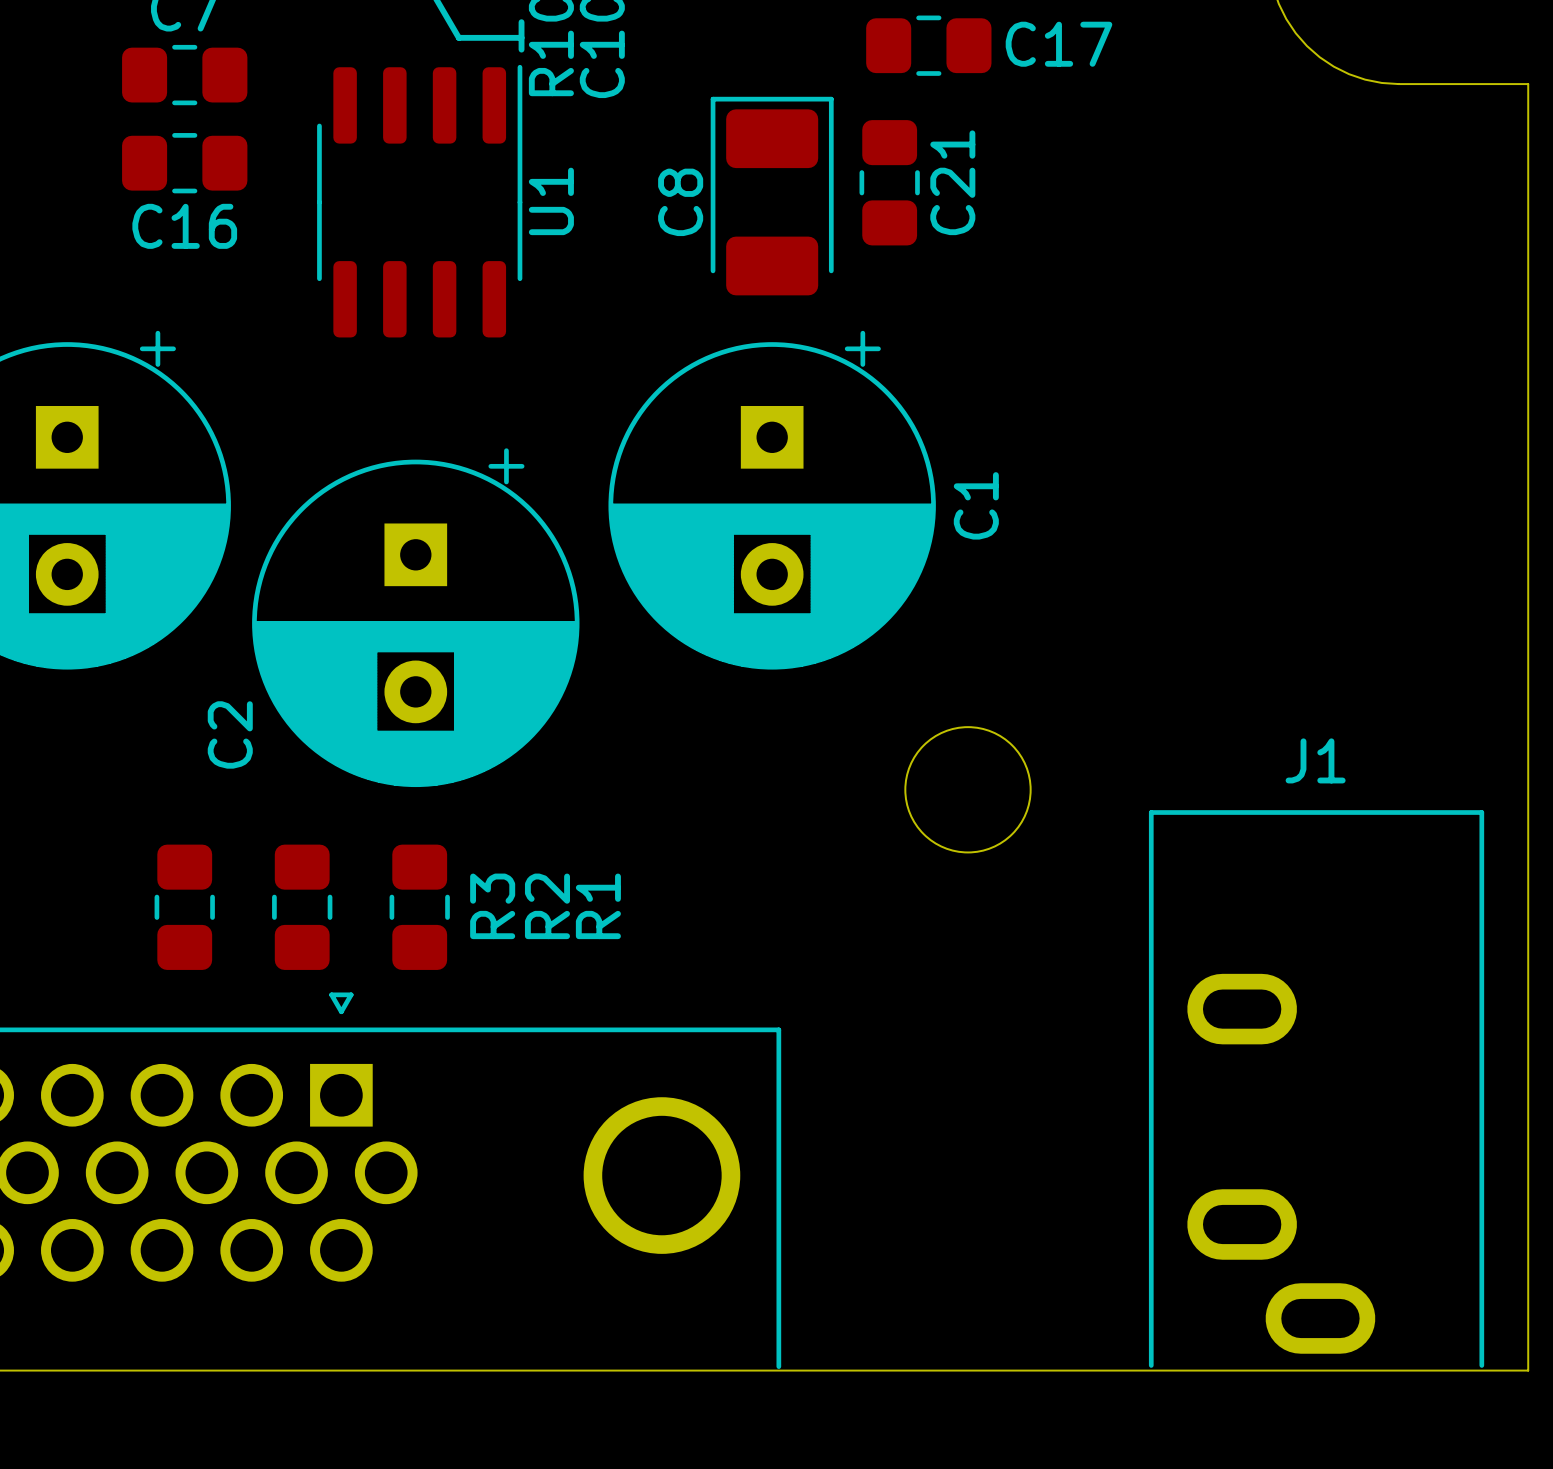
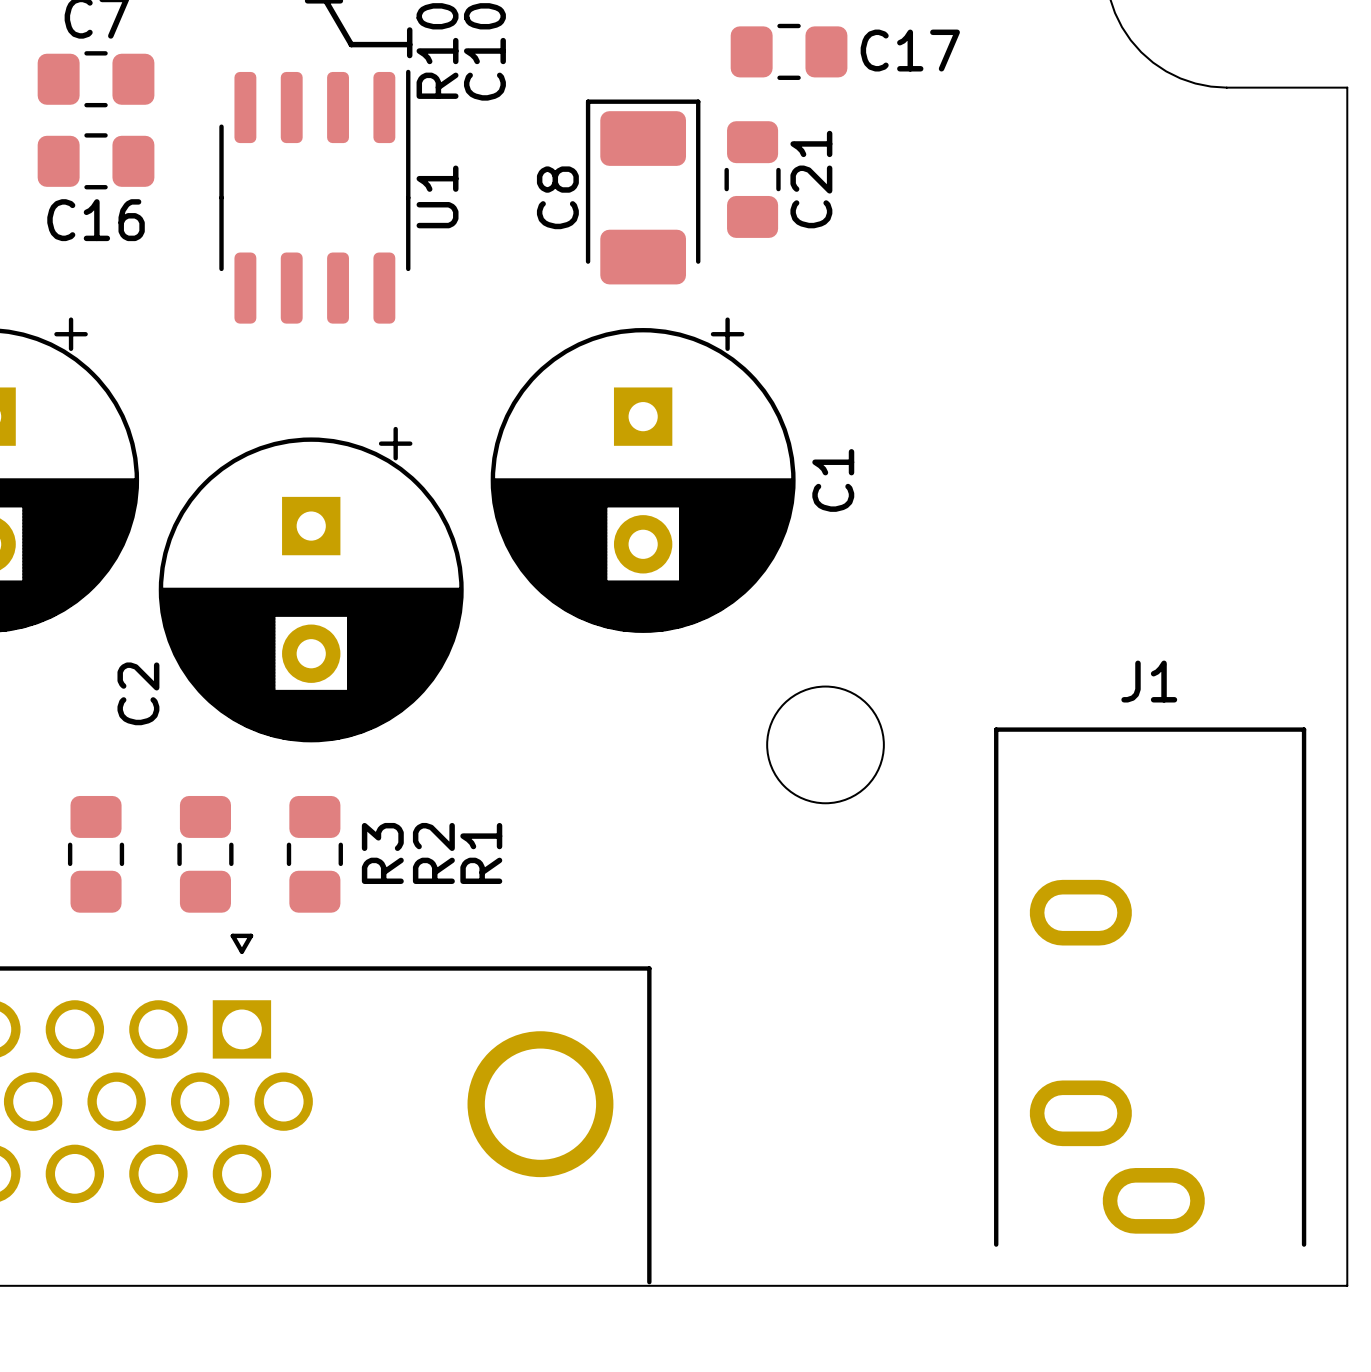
J1 position: (1316, 1088) -> (1150, 987)

